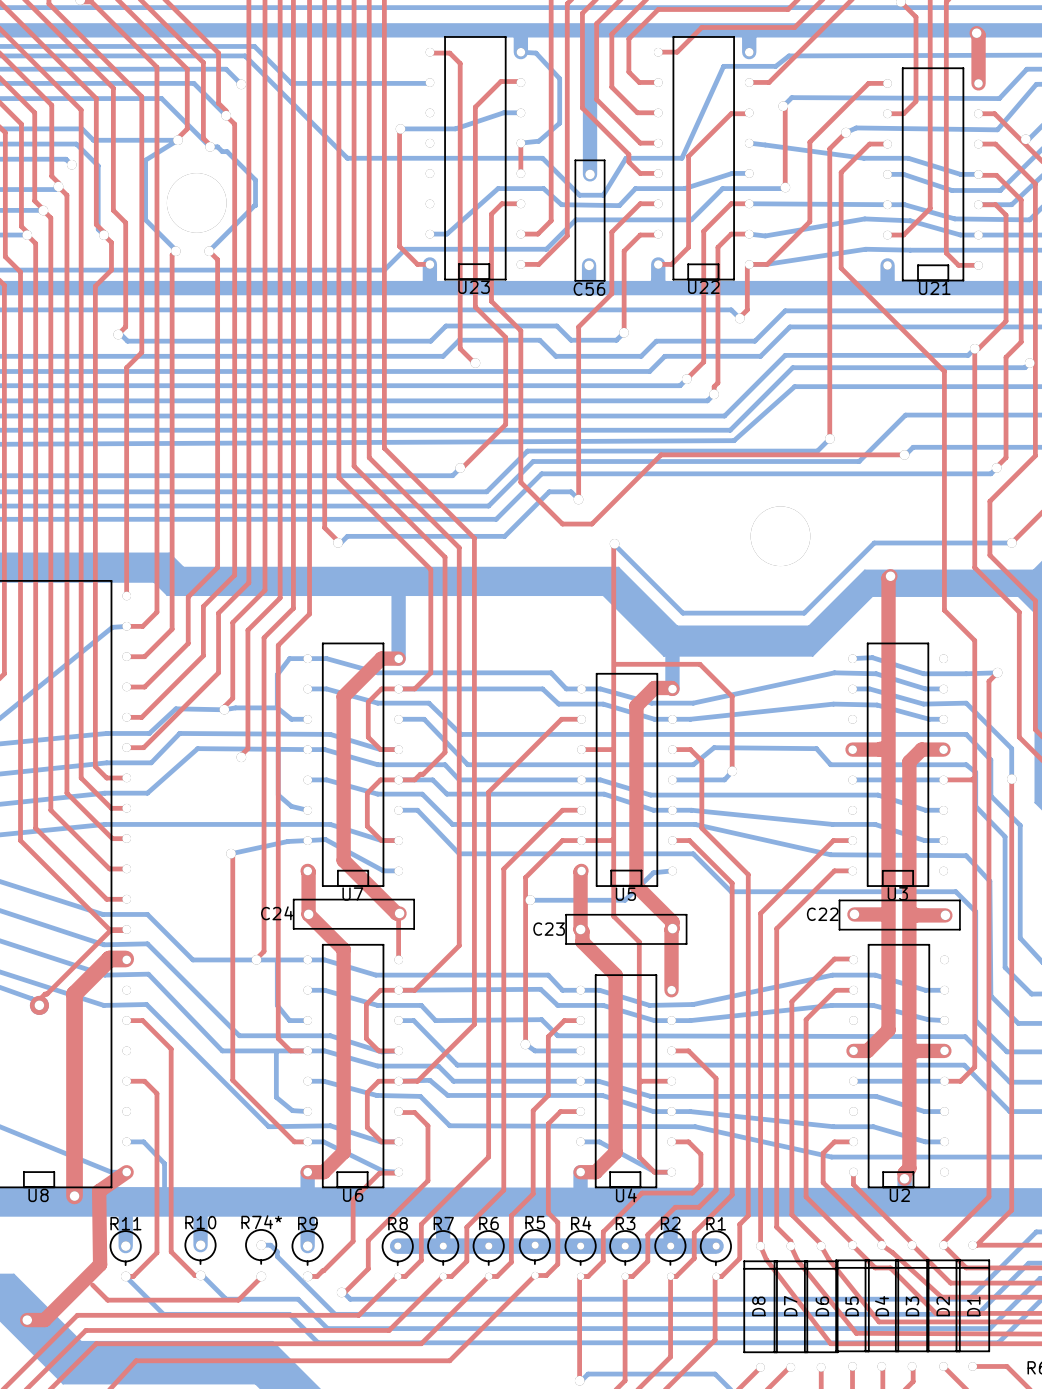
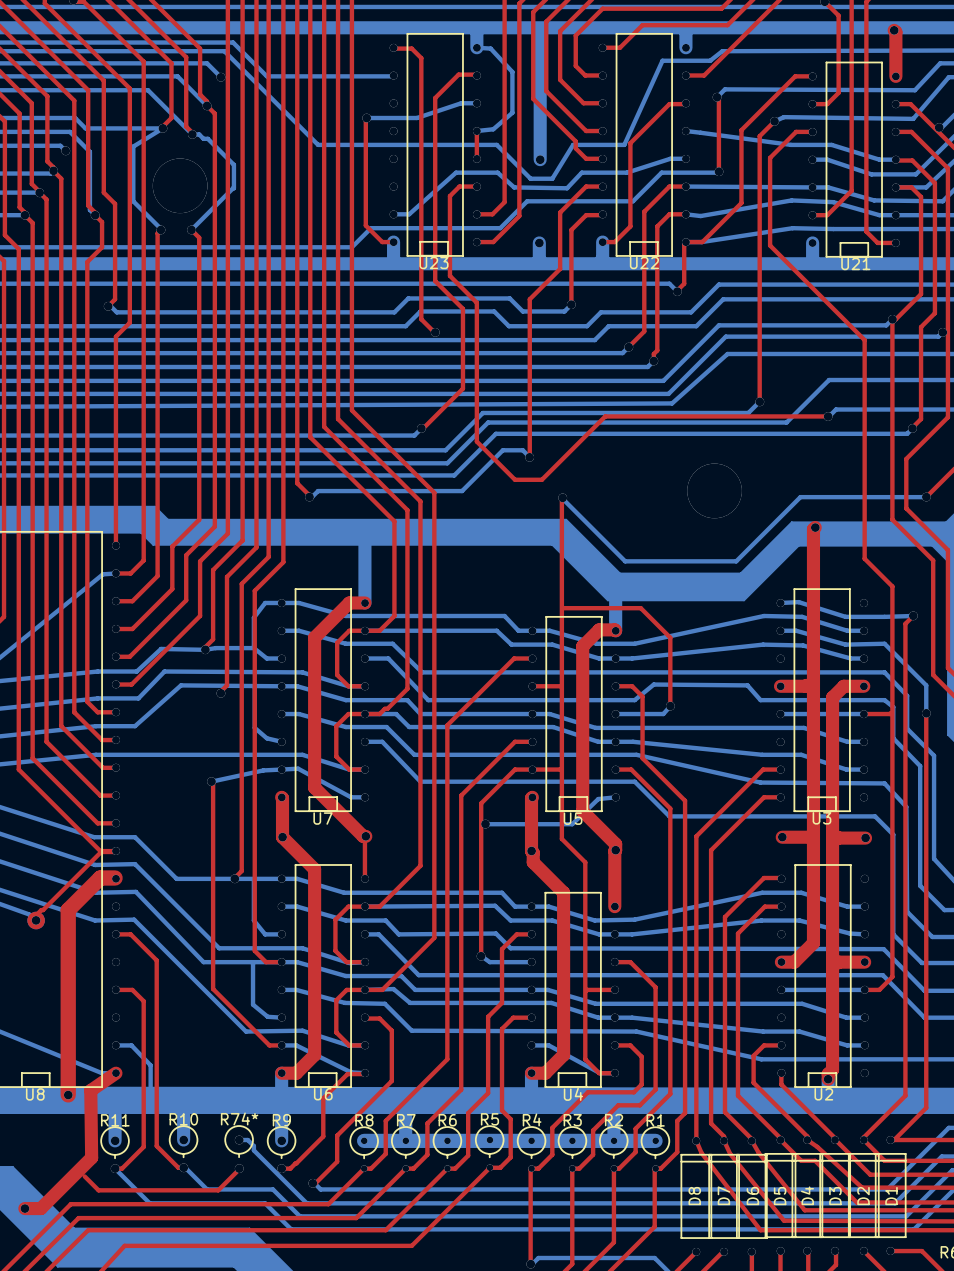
line: (575, 160) (604, 160) (604, 280) (575, 280) (575, 160) -> none
text: C56 (589, 289) -> none
line: (293, 899) (414, 899) (414, 928) (293, 928) (293, 899) -> none
line: (839, 900) (959, 900) (959, 929) (839, 929) (839, 900) -> none
text: C24 (277, 913) -> none
line: (566, 914) (686, 914) (686, 943) (566, 943) (566, 914) -> none
text: C22 (822, 914) -> none
text: C23 (549, 929) -> none

